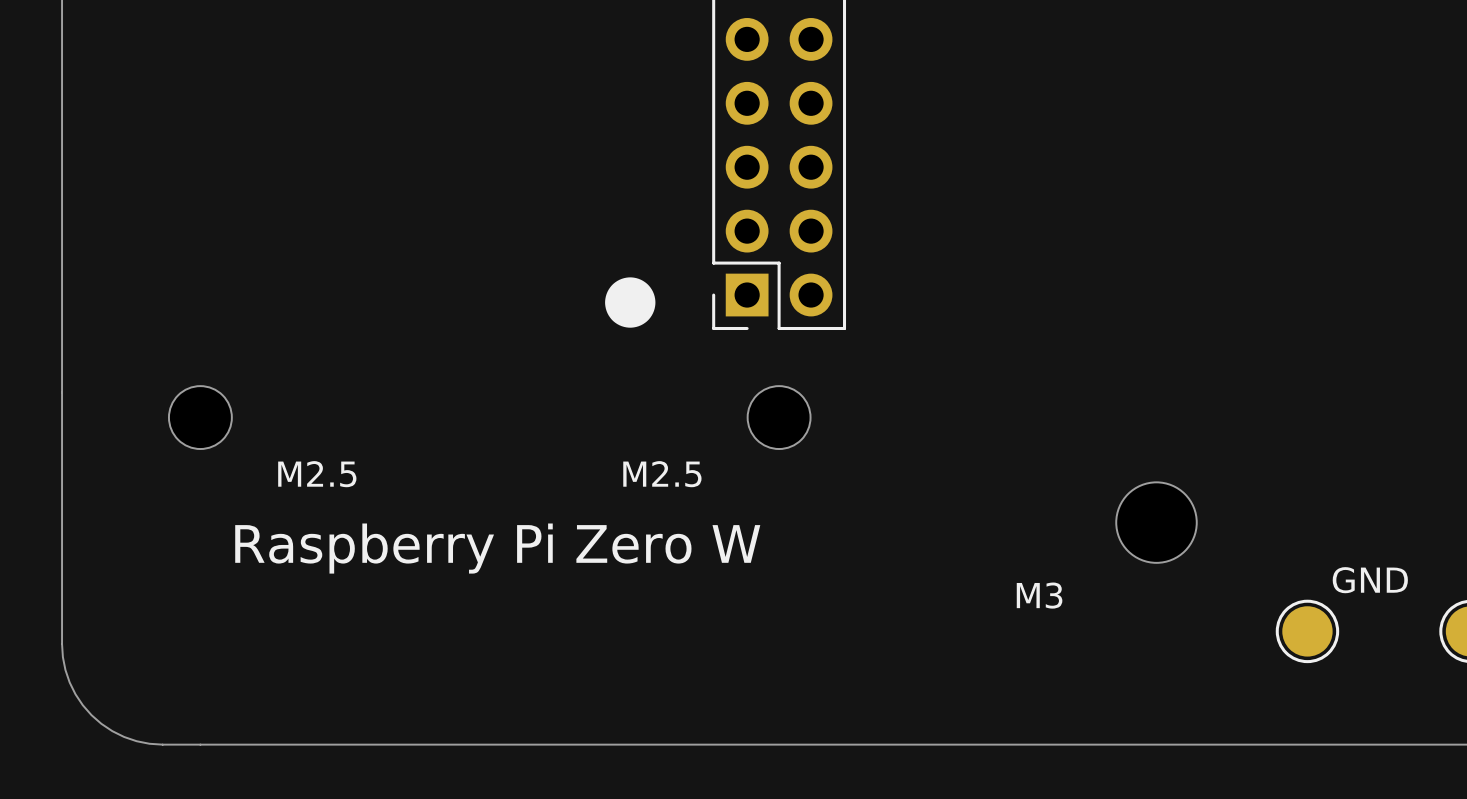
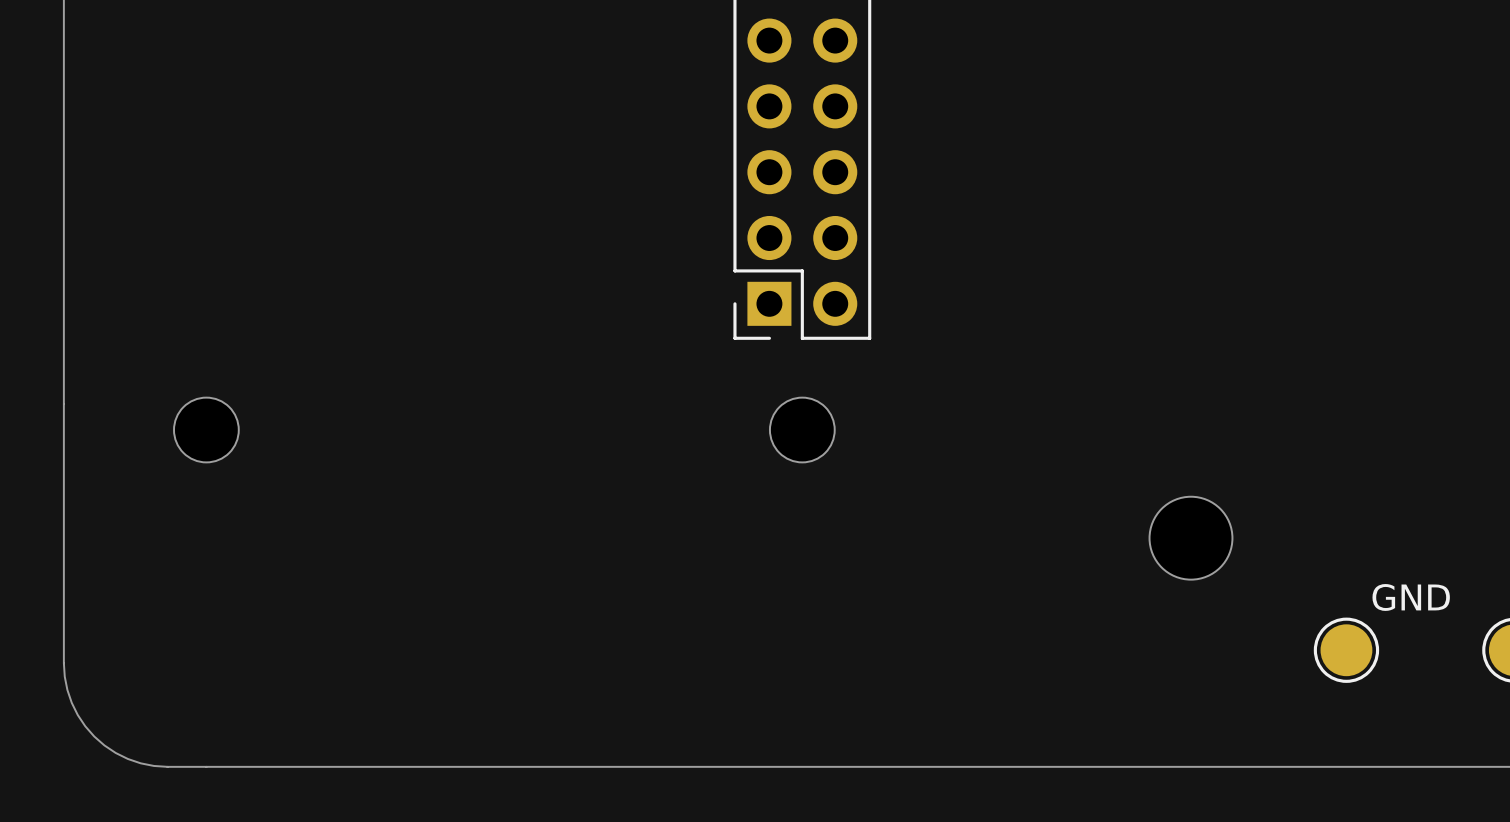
drawing: [605, 277, 656, 328] -> none
text: M2.5 (317, 474) -> none
text: M2.5 (662, 474) -> none
text: Raspberry Pi Zero W (497, 548) -> none
text: M3 (1039, 595) -> none

